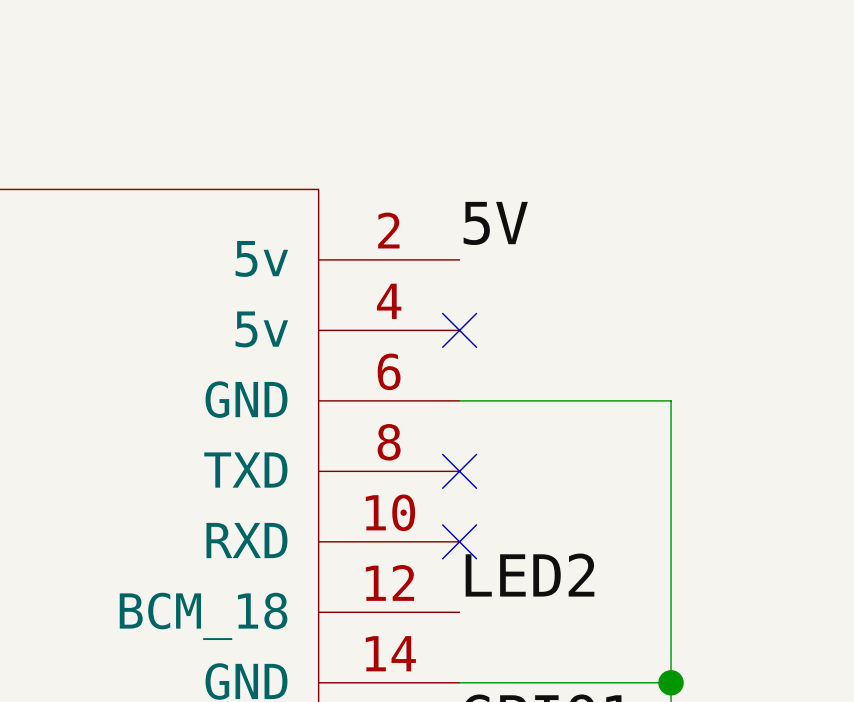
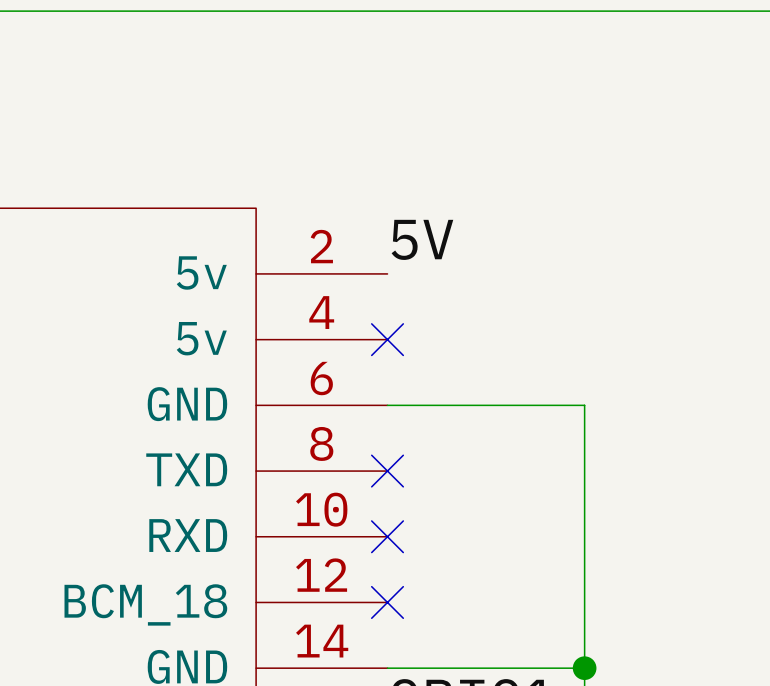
label: LED2 (530, 575) -> none
no-connect mark: none -> (387, 602)

